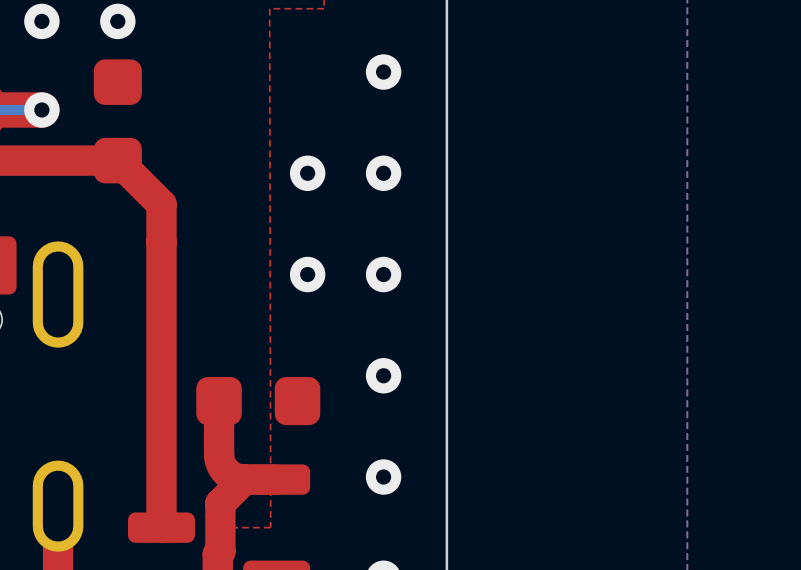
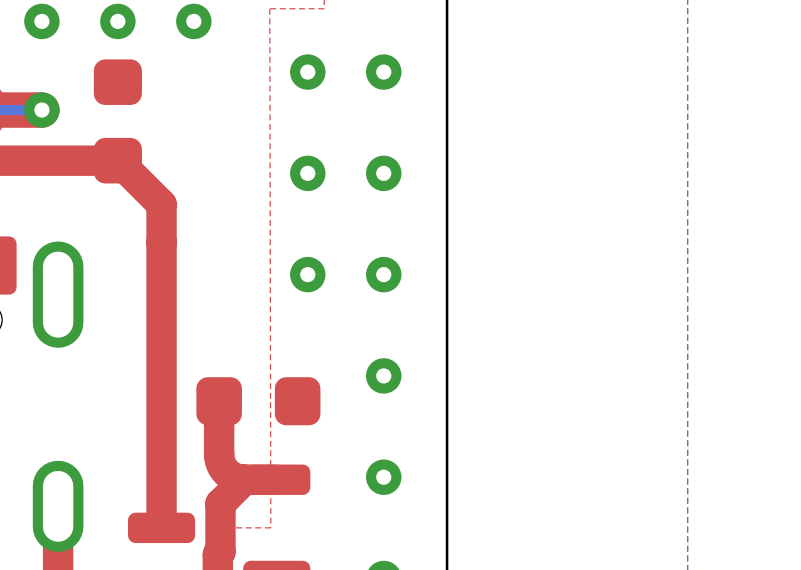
via: none -> (193, 21)
via: none -> (307, 72)

